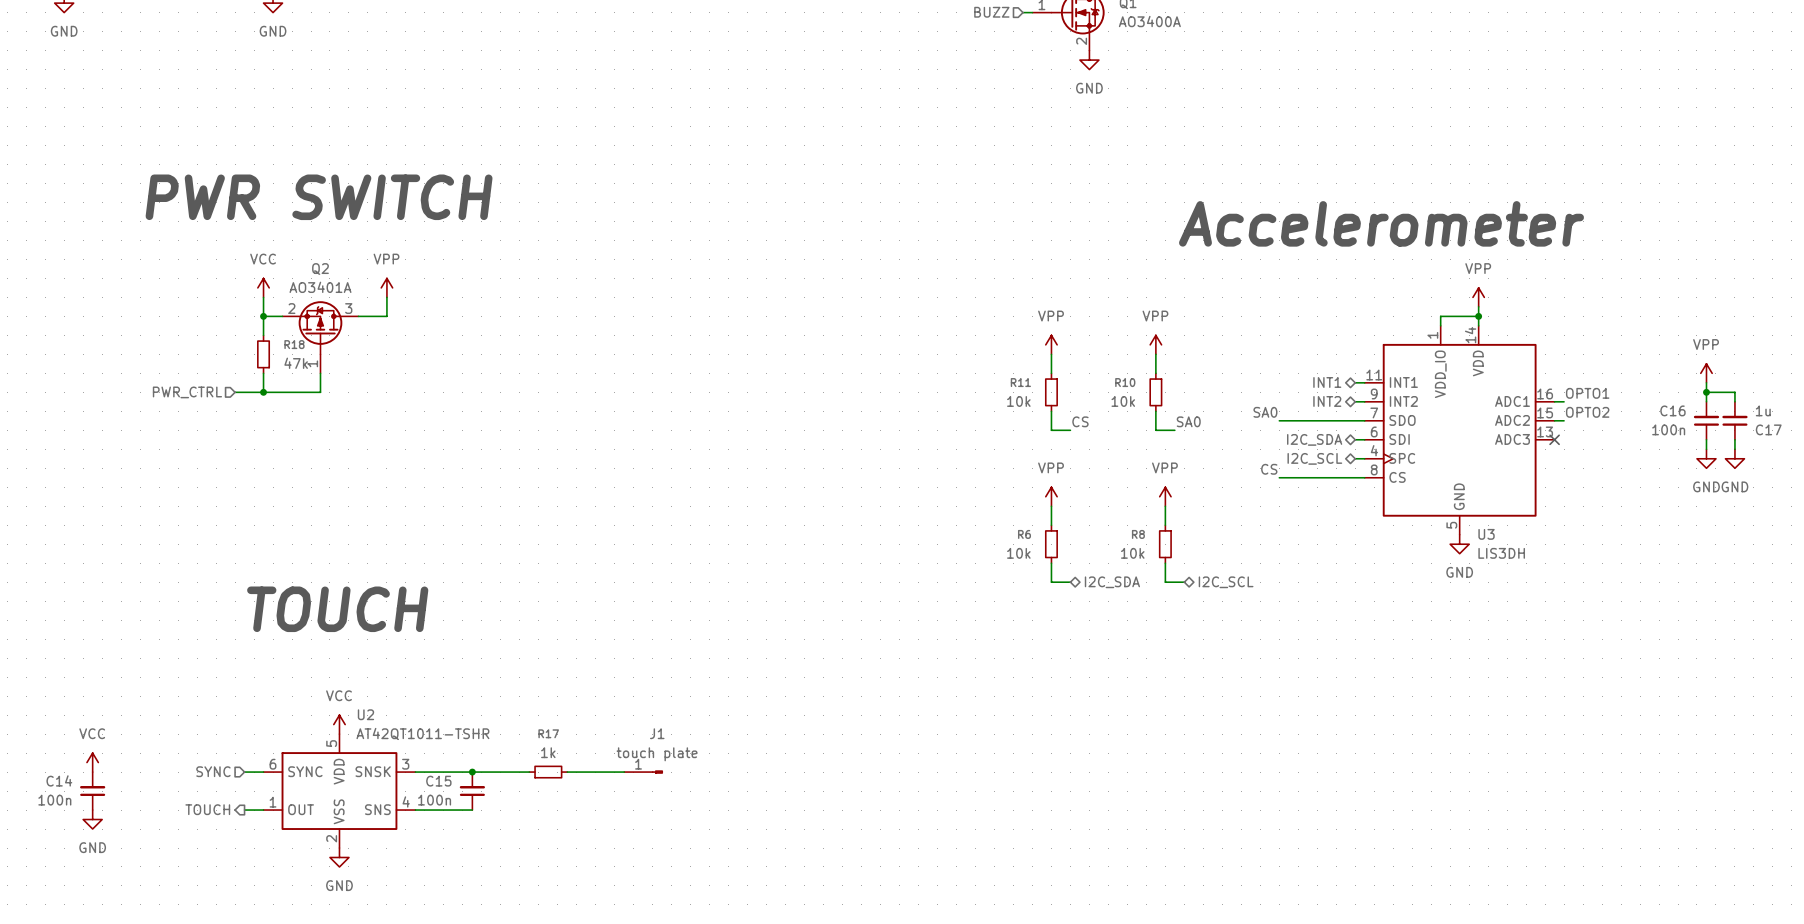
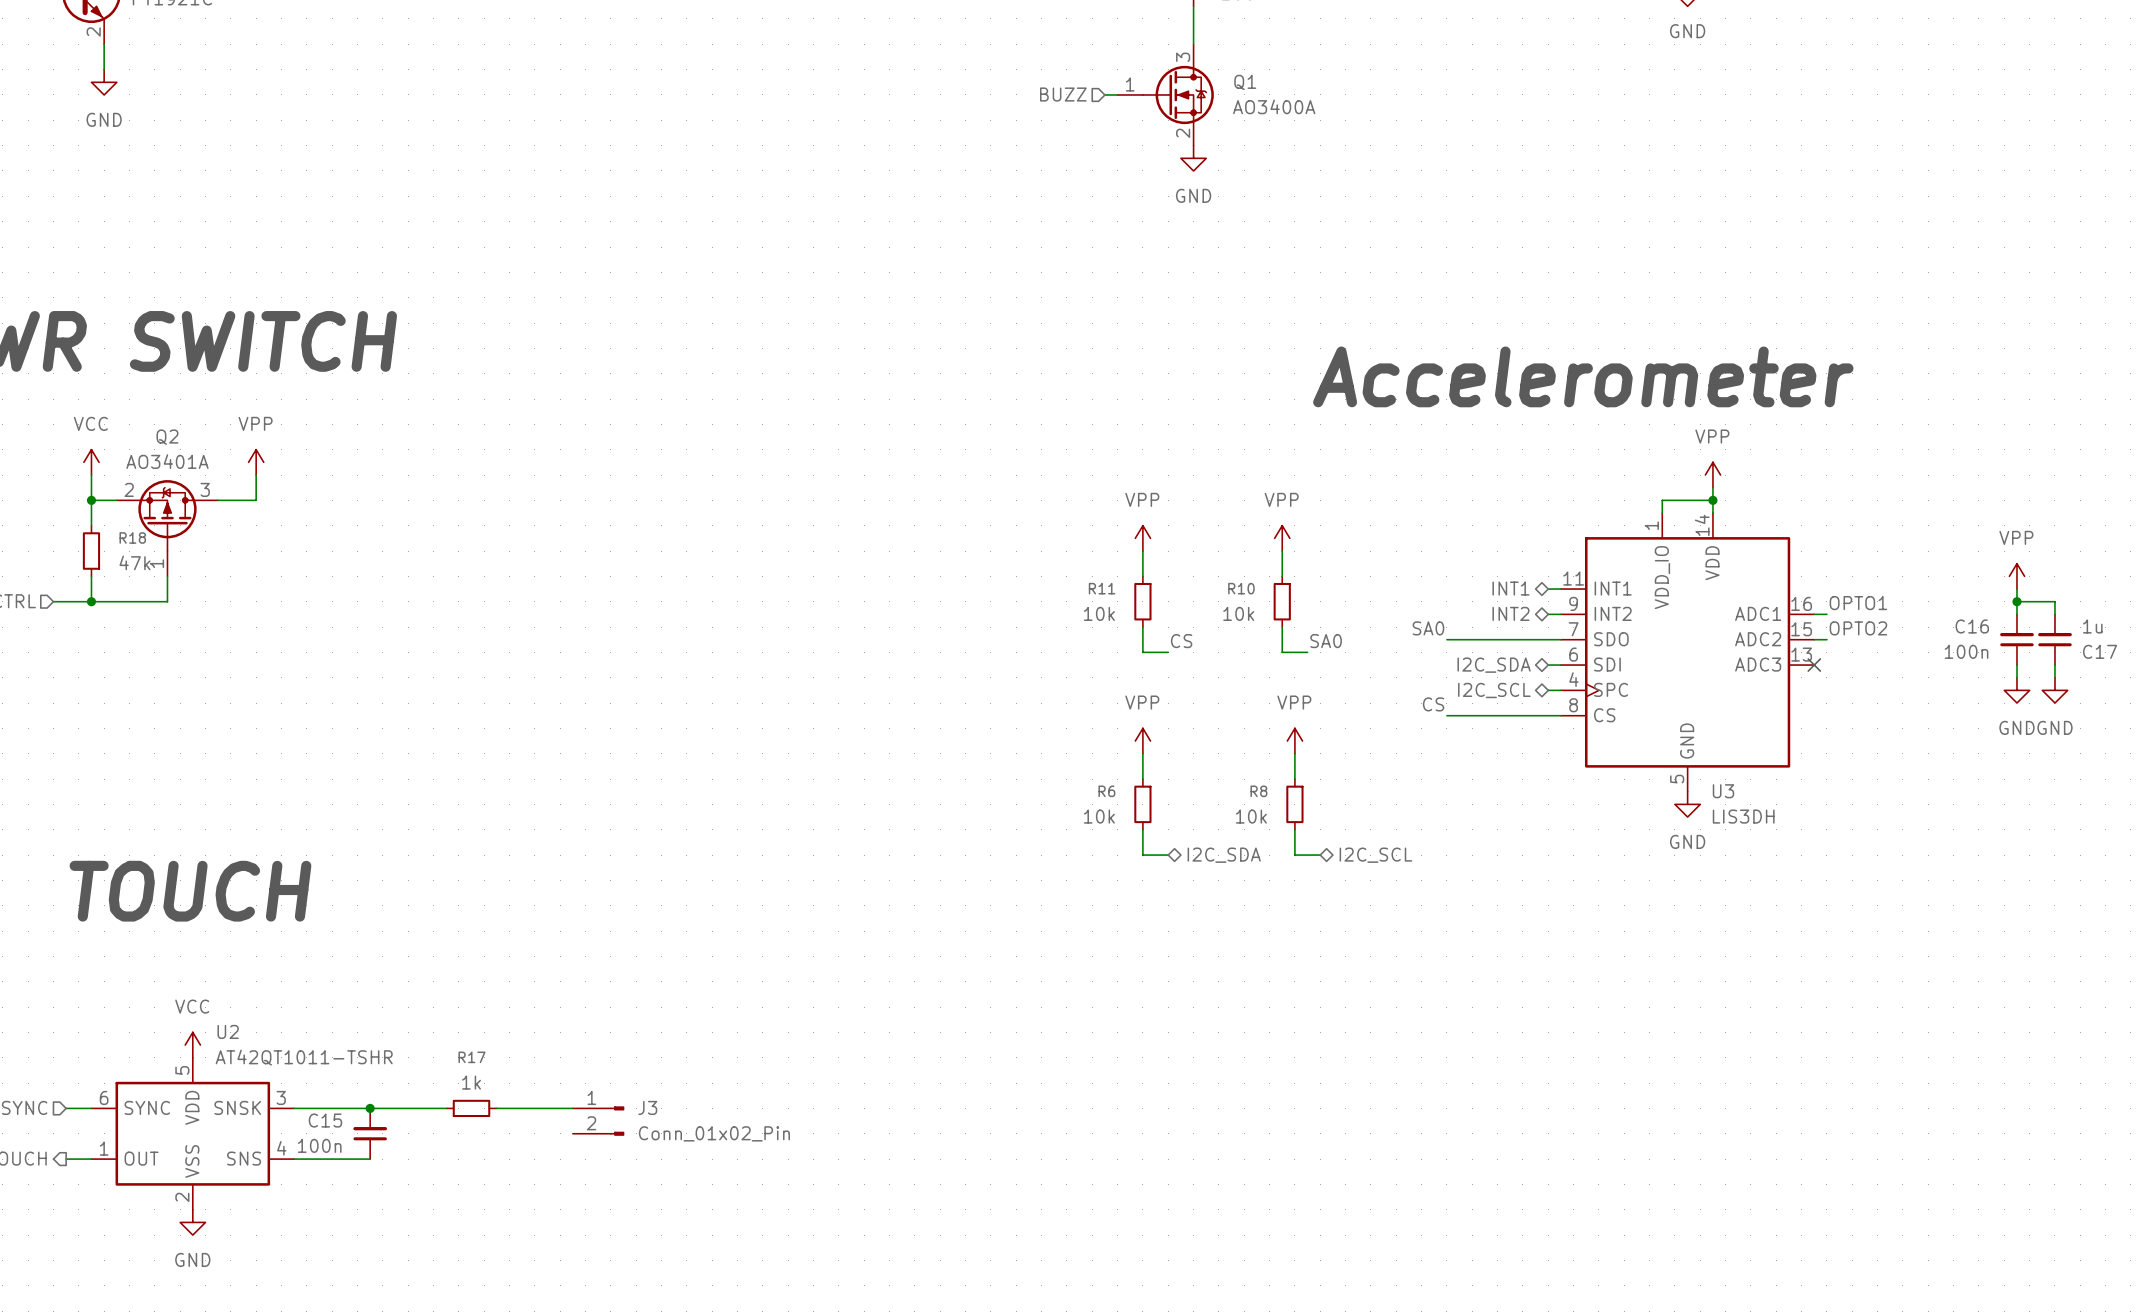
J1: touch plate (643, 772) -> none
J3: none -> Conn_01x02_Pin (598, 1121)

